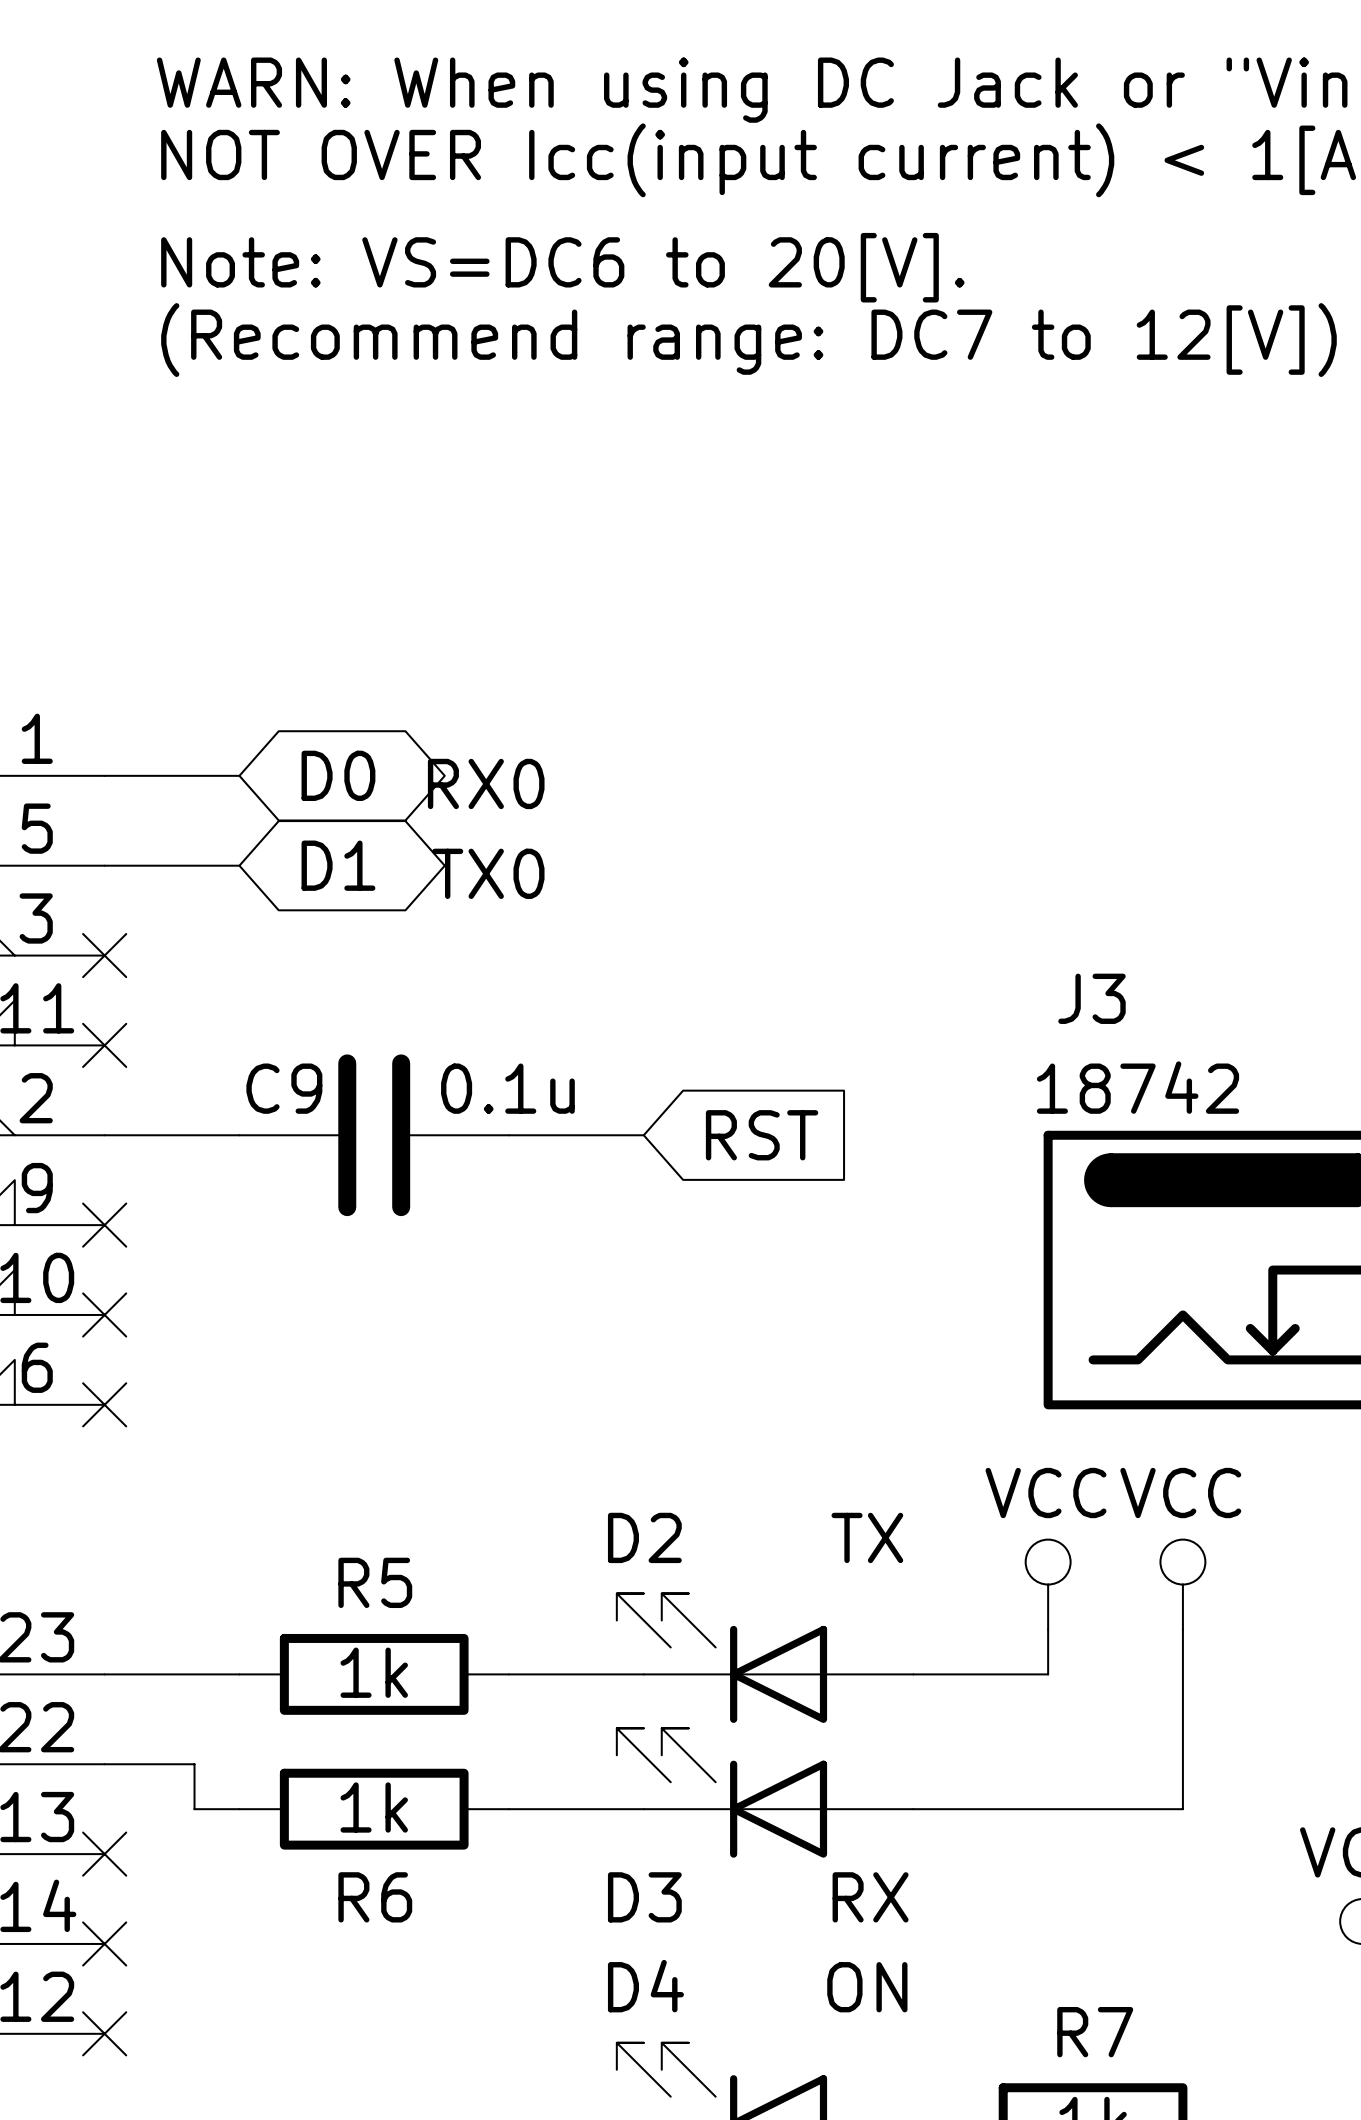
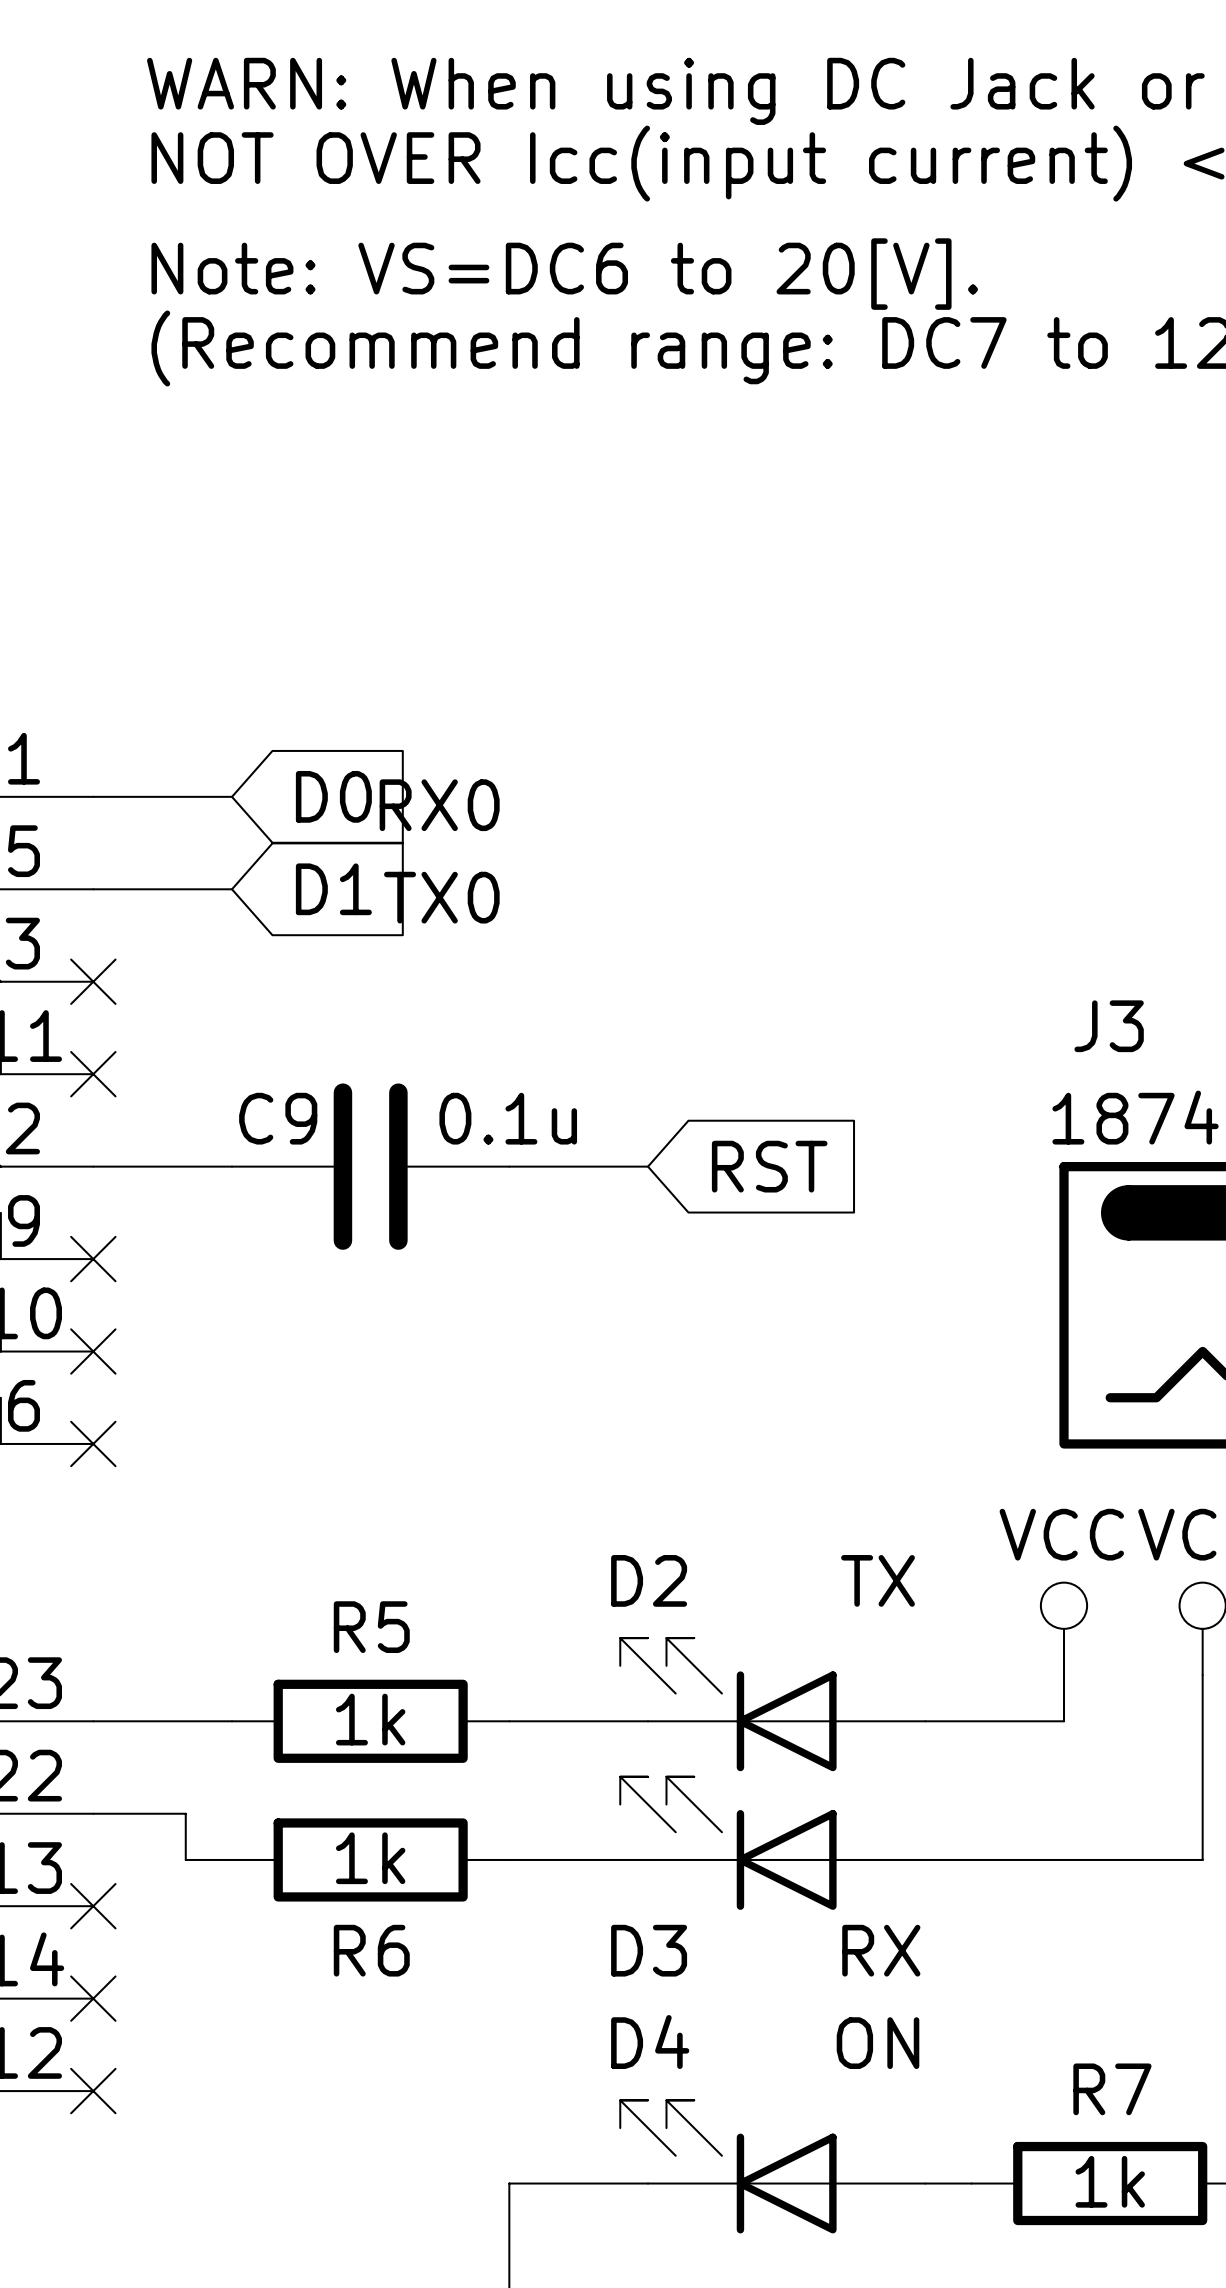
global label shape: bidirectional (338, 775) -> input (333, 796)
text position: RX0 (486, 783) -> RX0 (439, 805)
global label shape: bidirectional (338, 865) -> input (333, 889)
text position: TX0 (488, 873) -> TX0 (441, 897)

